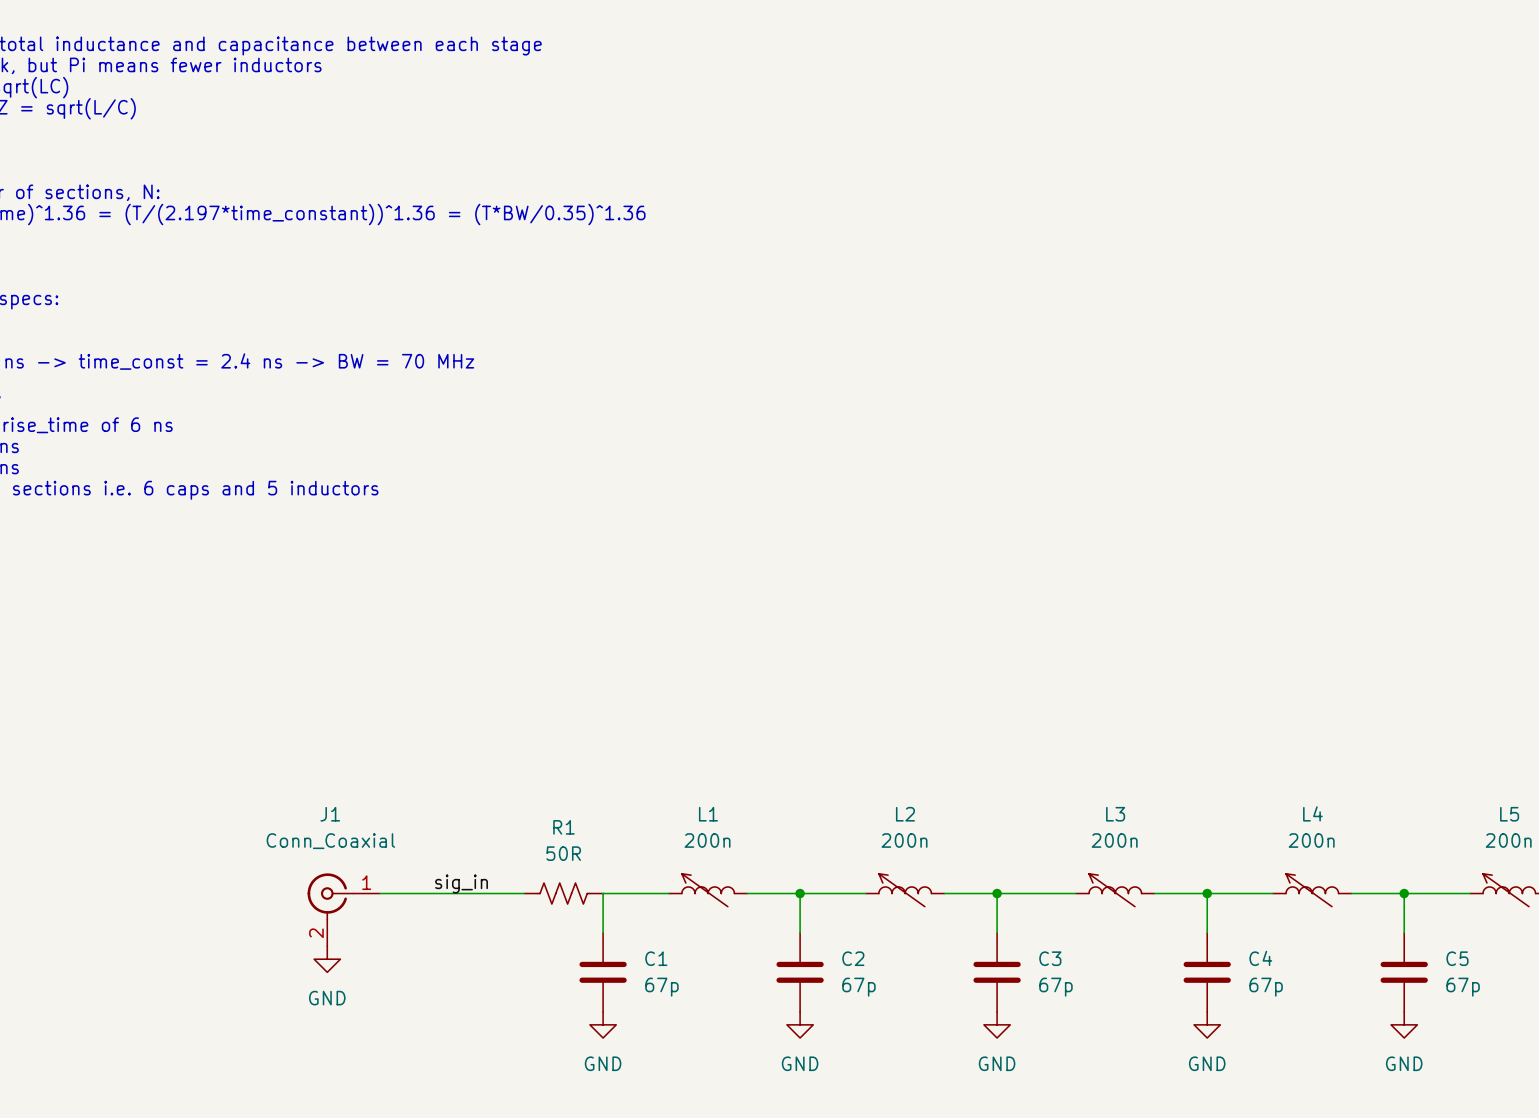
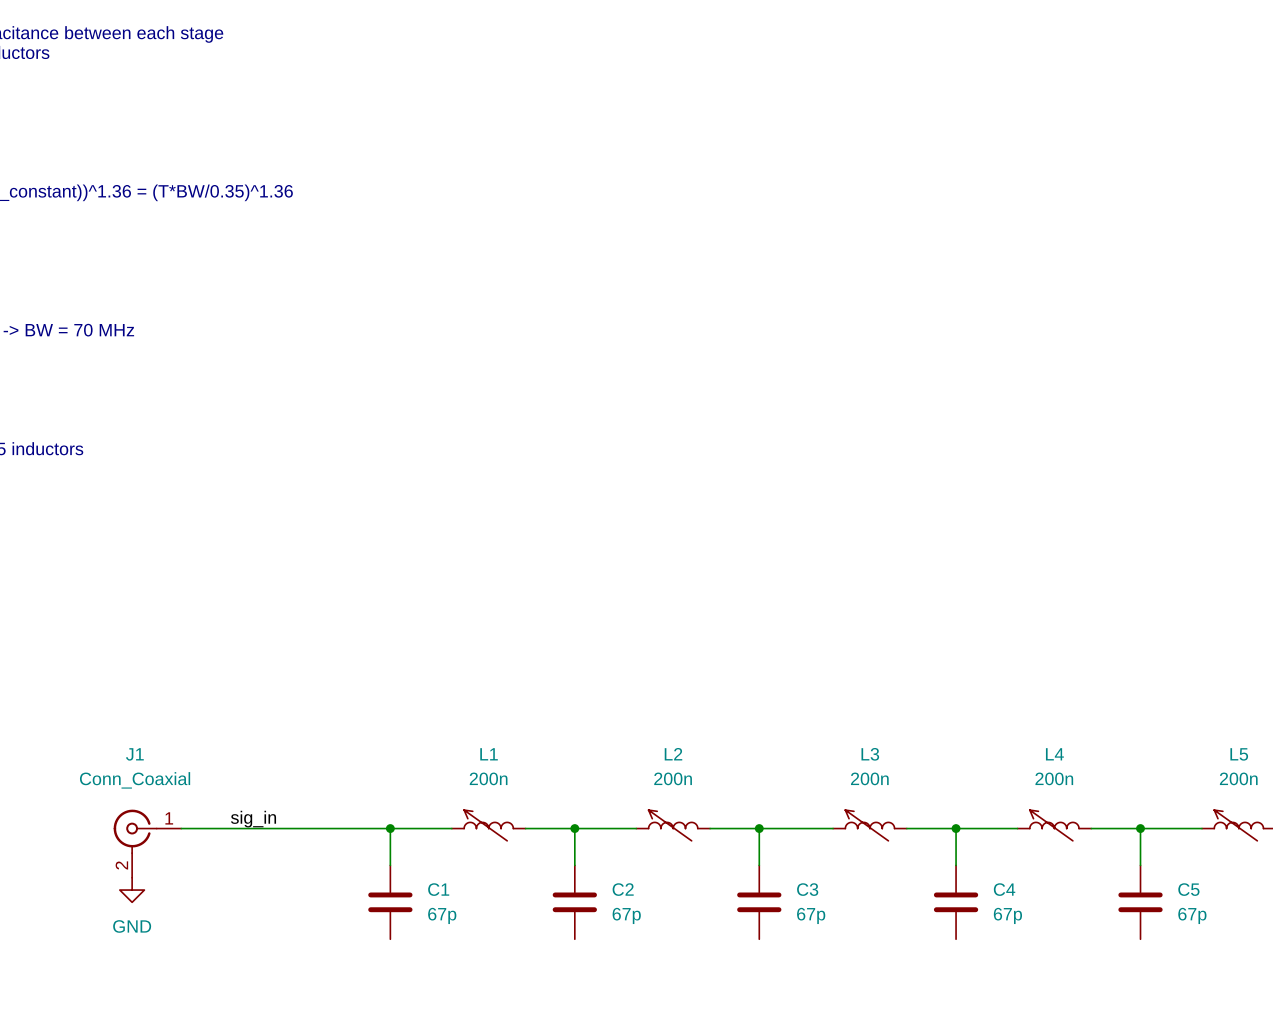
R1: 50R (563, 893) -> none
junction: none -> (390, 828)
power symbol: GND (603, 1024) -> none
power symbol: GND (800, 1024) -> none
power symbol: GND (997, 1024) -> none
power symbol: GND (1207, 1024) -> none
power symbol: GND (1404, 1024) -> none

